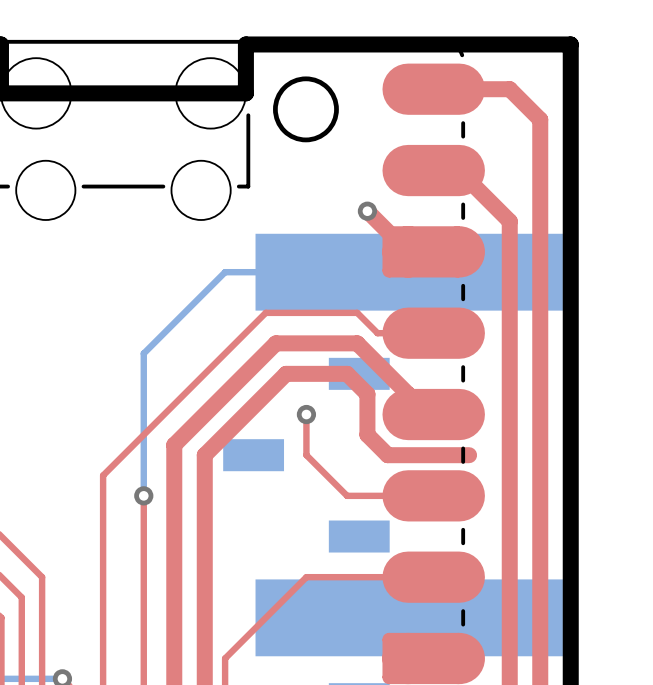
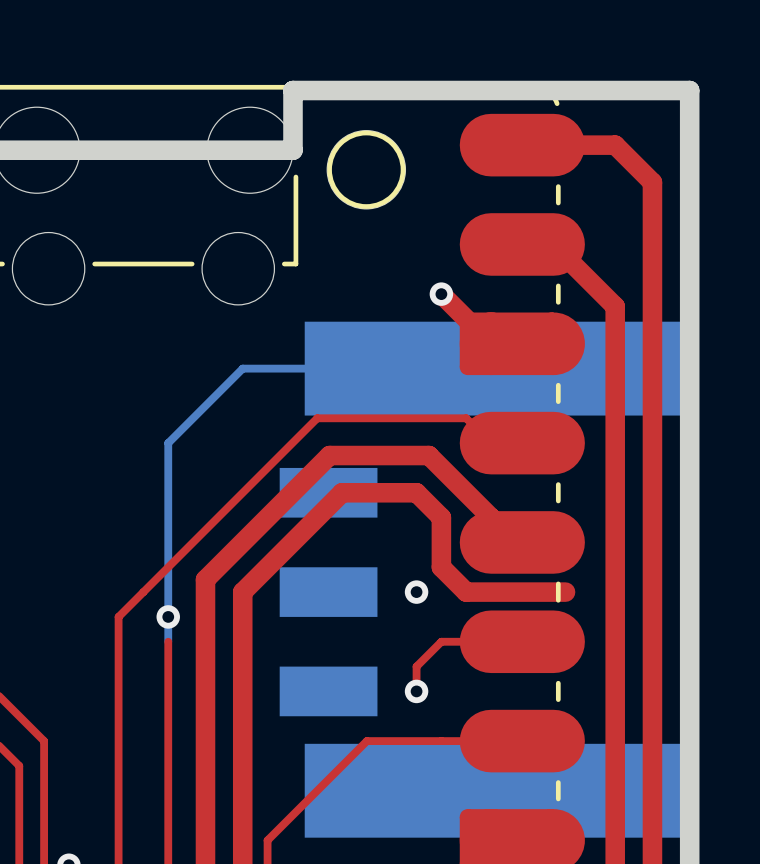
bottom track: (225, 272) (143, 353) -> (267, 368) (242, 368) (168, 443) (168, 467)
top track: (357, 312) (377, 333) (408, 333) -> (428, 418) (466, 418) (491, 443)
part footprint: [223, 357, 390, 553] -> [279, 467, 378, 717]
top track: (306, 414) (306, 455) (347, 495) (367, 495) -> (416, 691) (416, 666) (441, 641)
via position: (306, 414) -> (416, 592)
via position: (143, 495) -> (168, 616)
via: none -> (416, 691)

